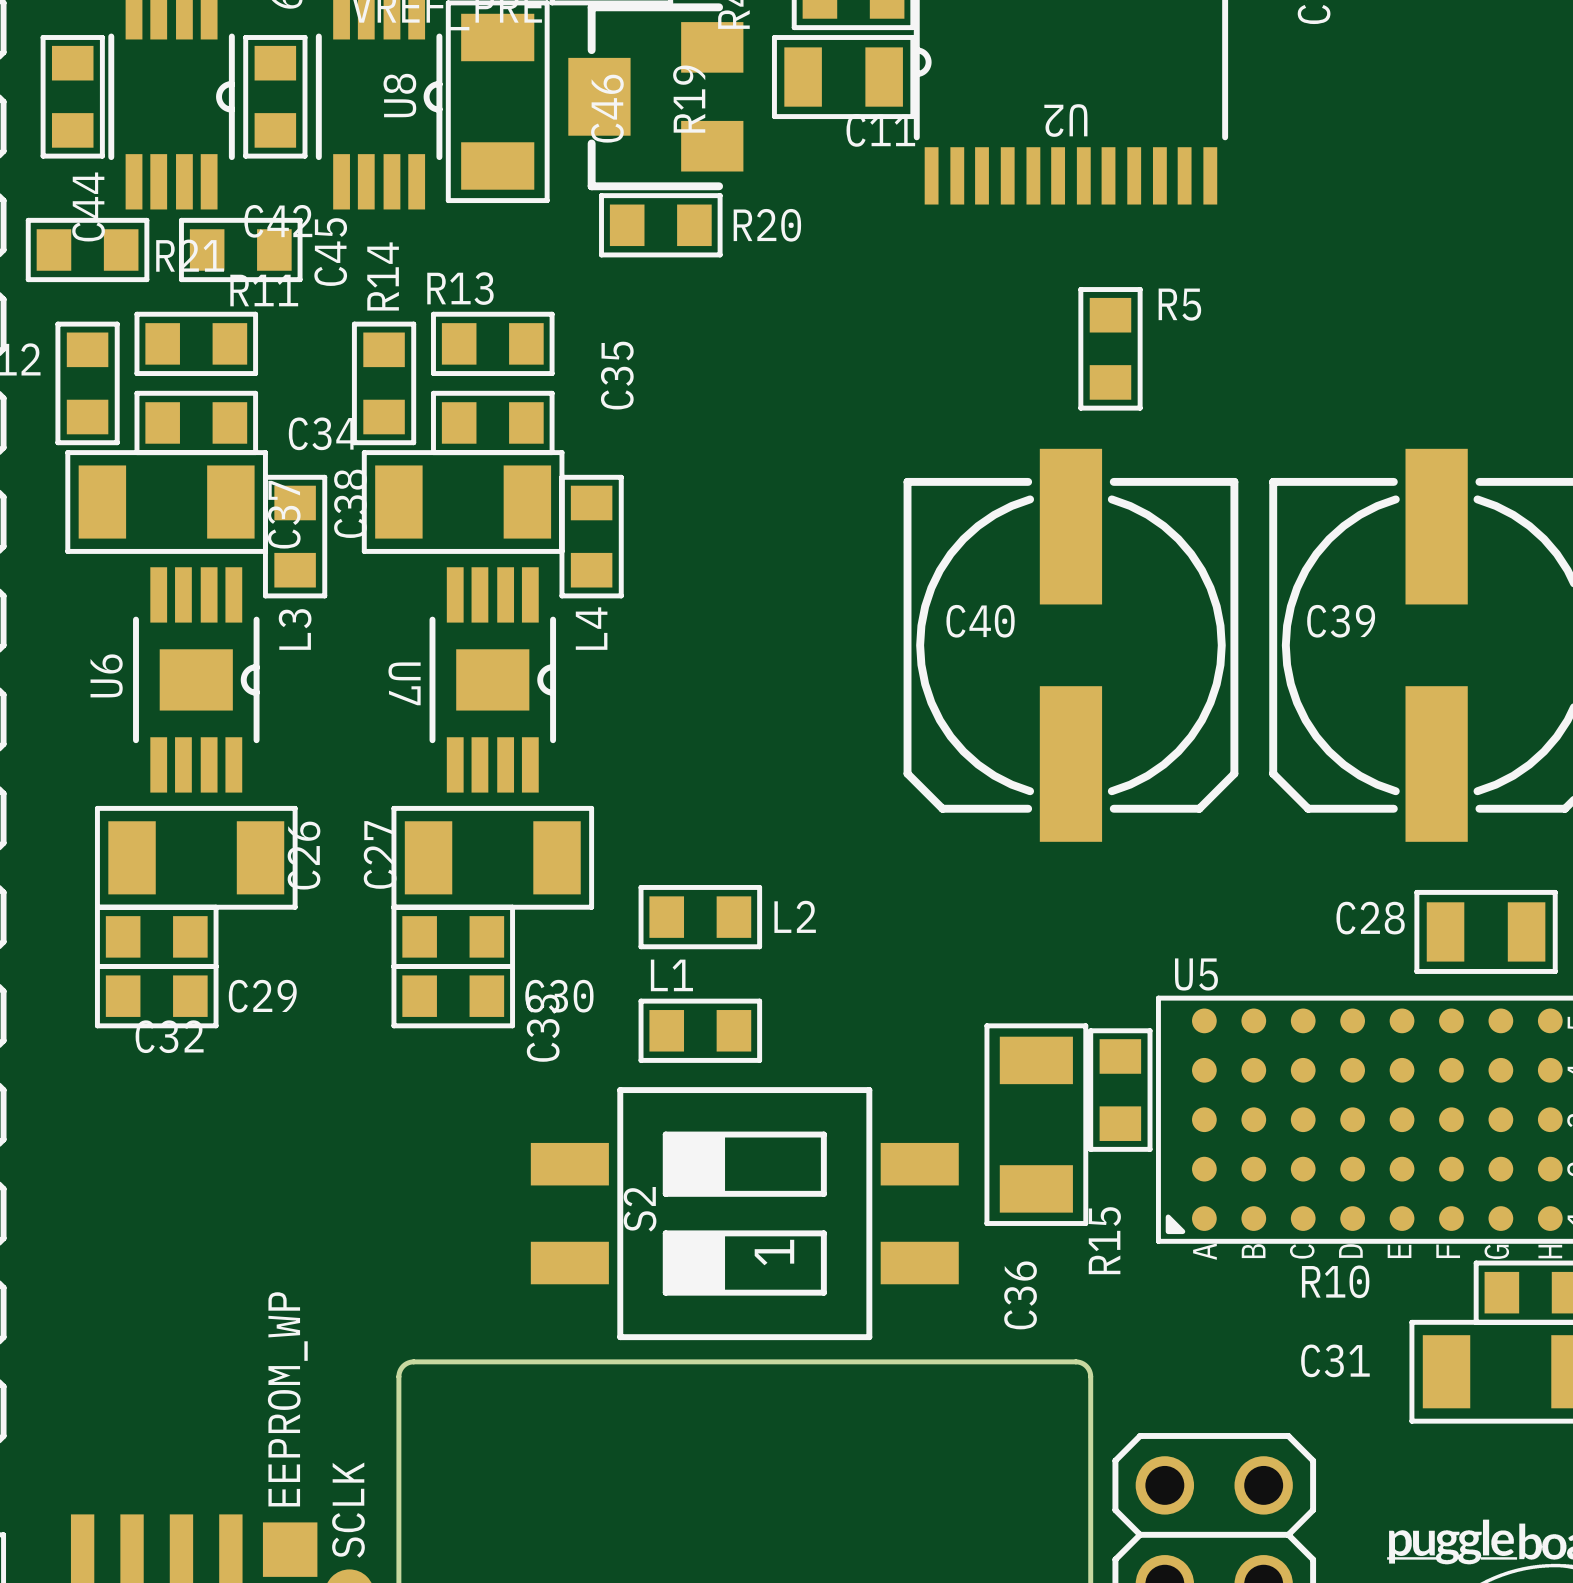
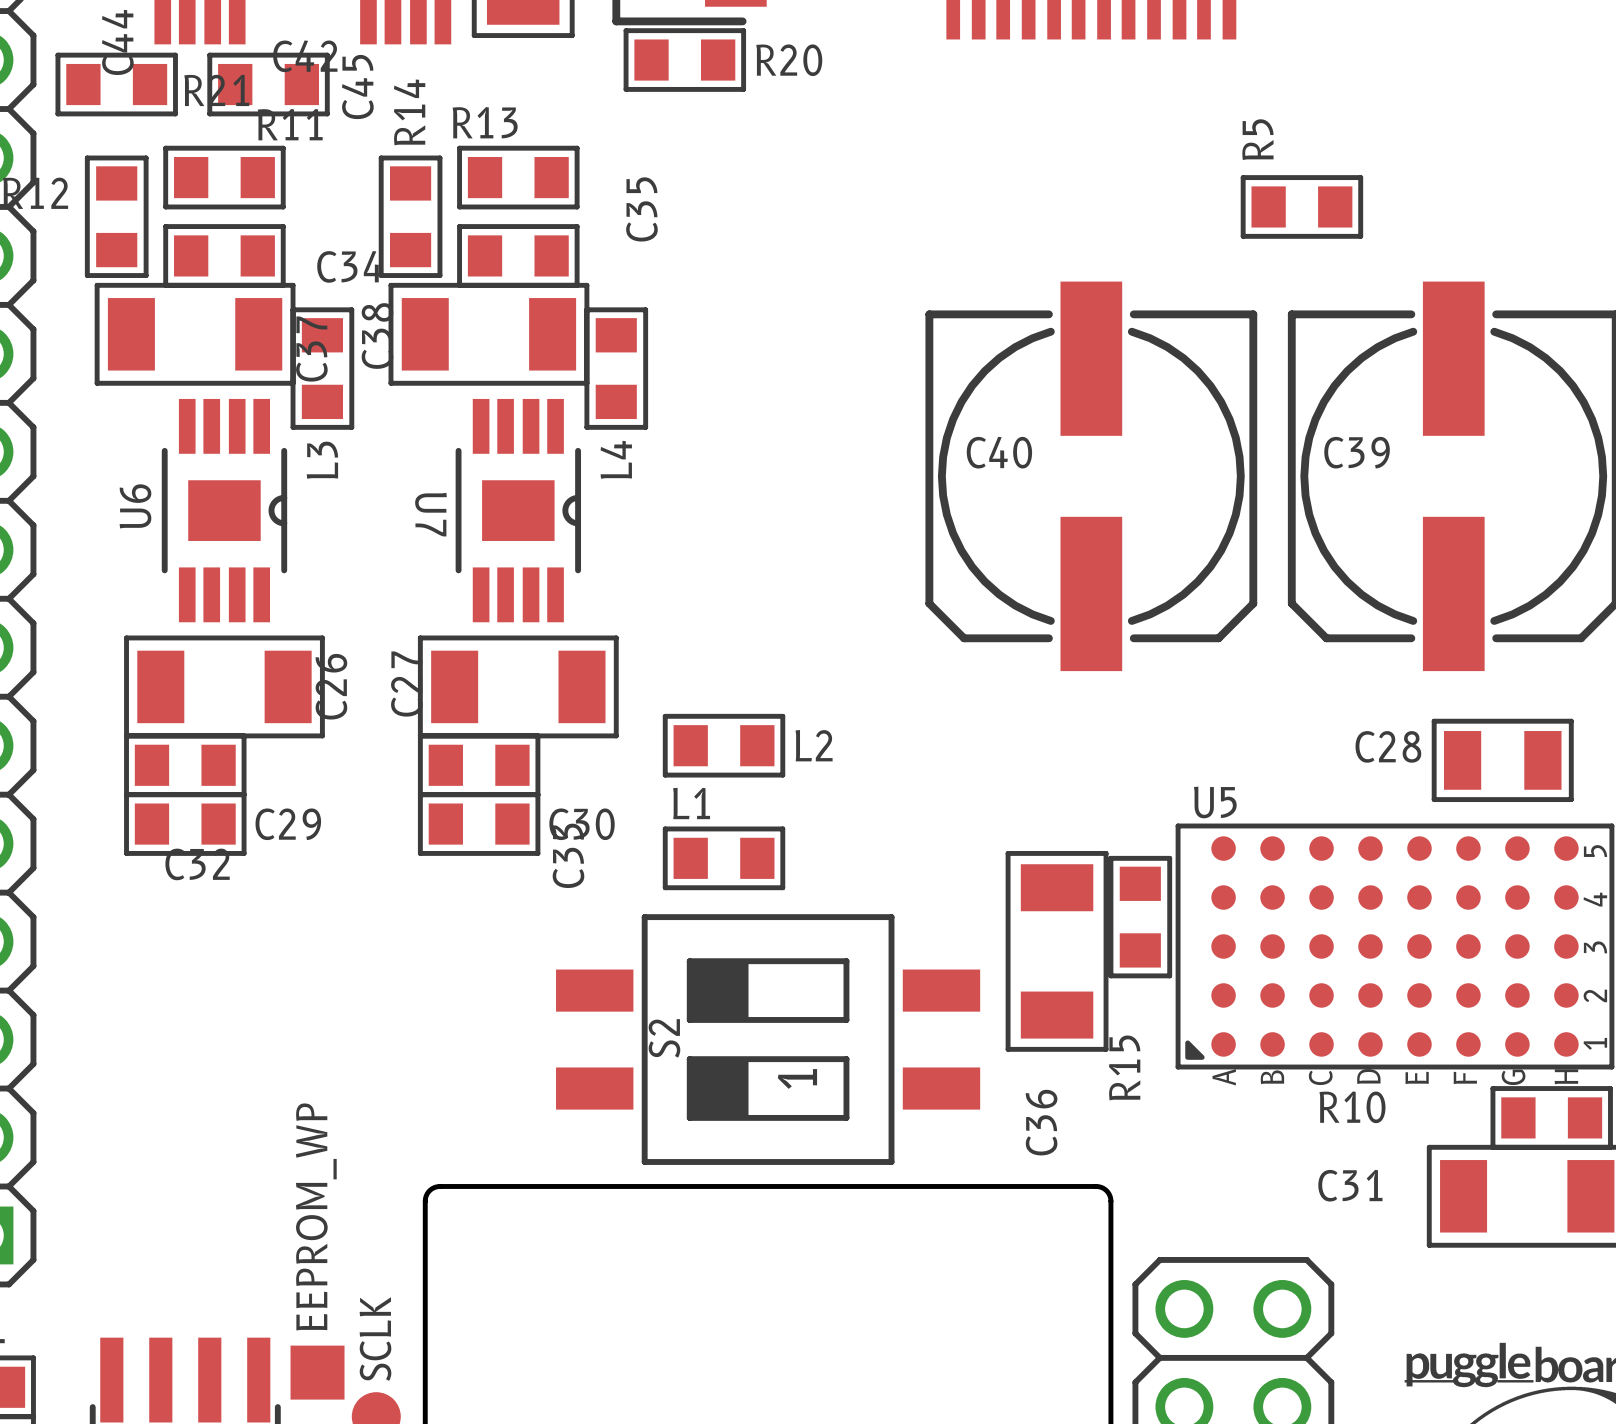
R5 name position: R5 (1179, 304) -> R5 (1257, 139)
R5 rotation: 0° (1110, 348) -> 90° clockwise (1301, 206)
R5 position: (1110, 348) -> (1301, 206)

